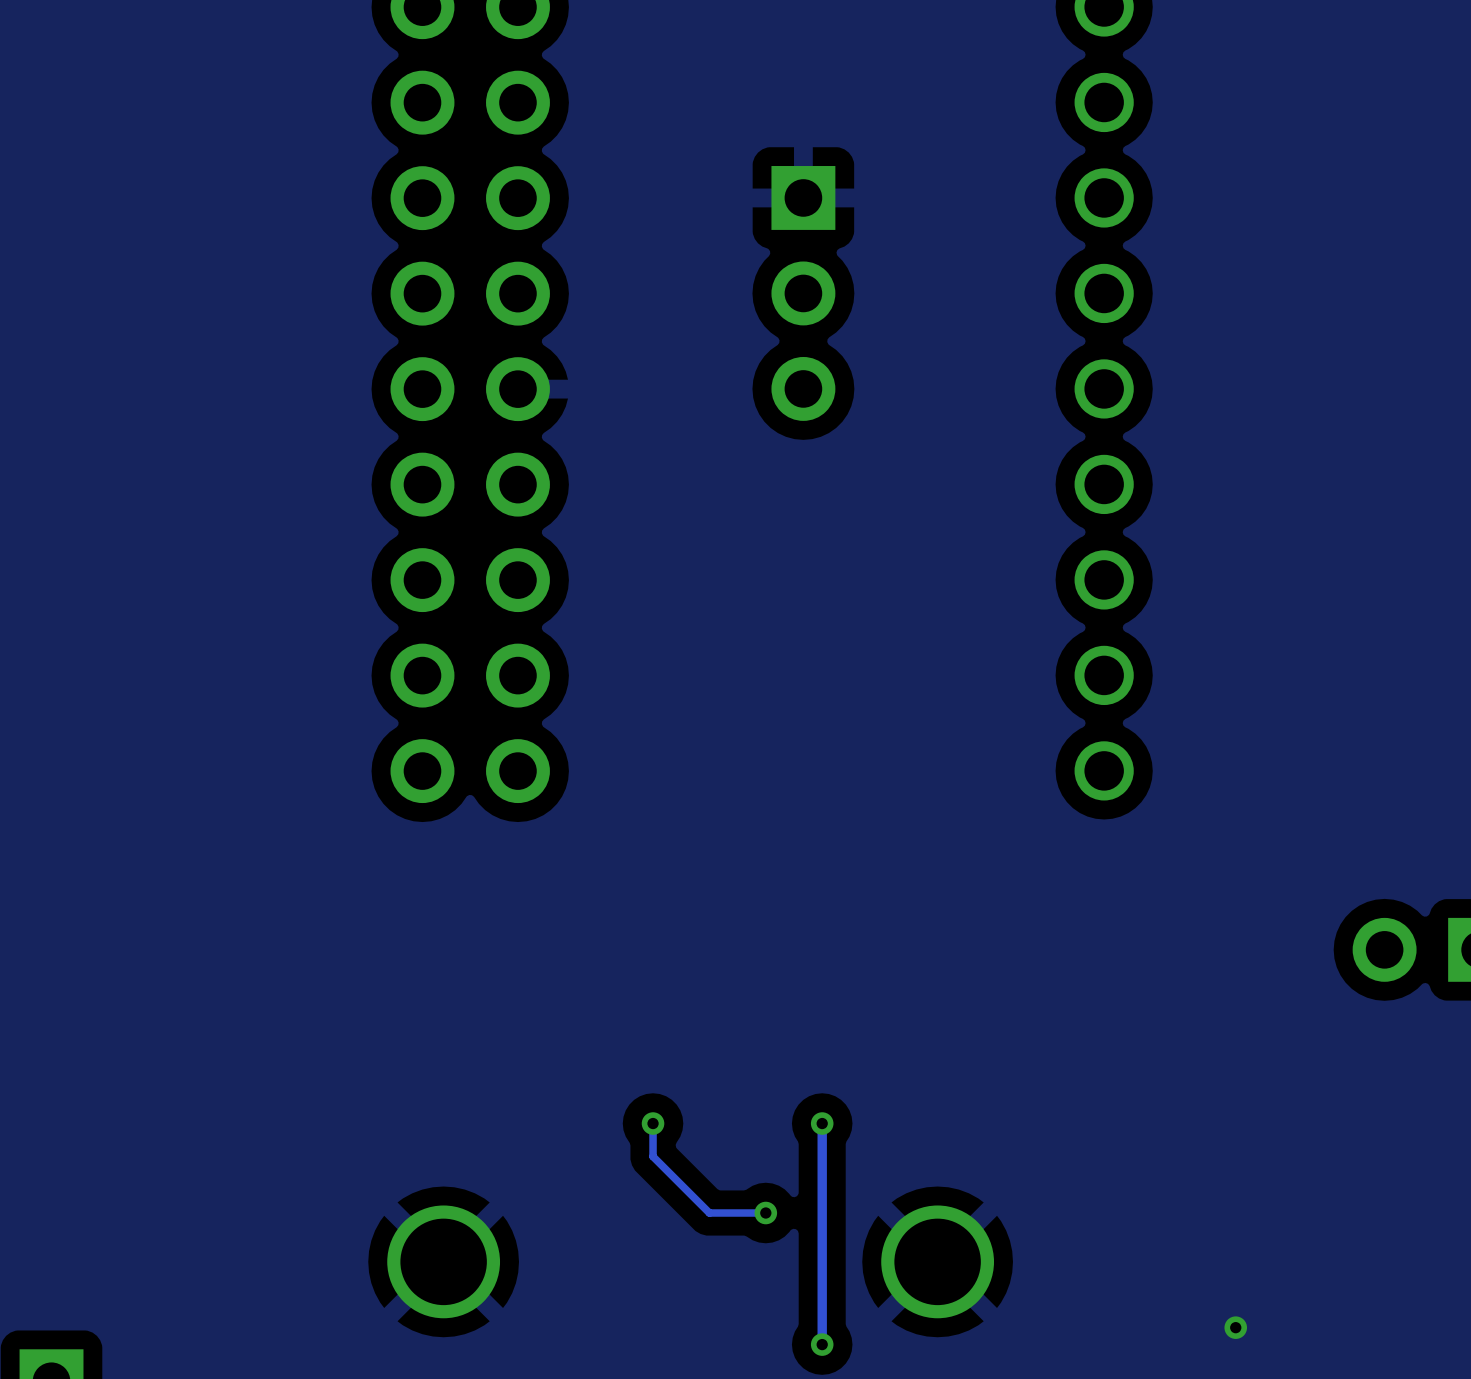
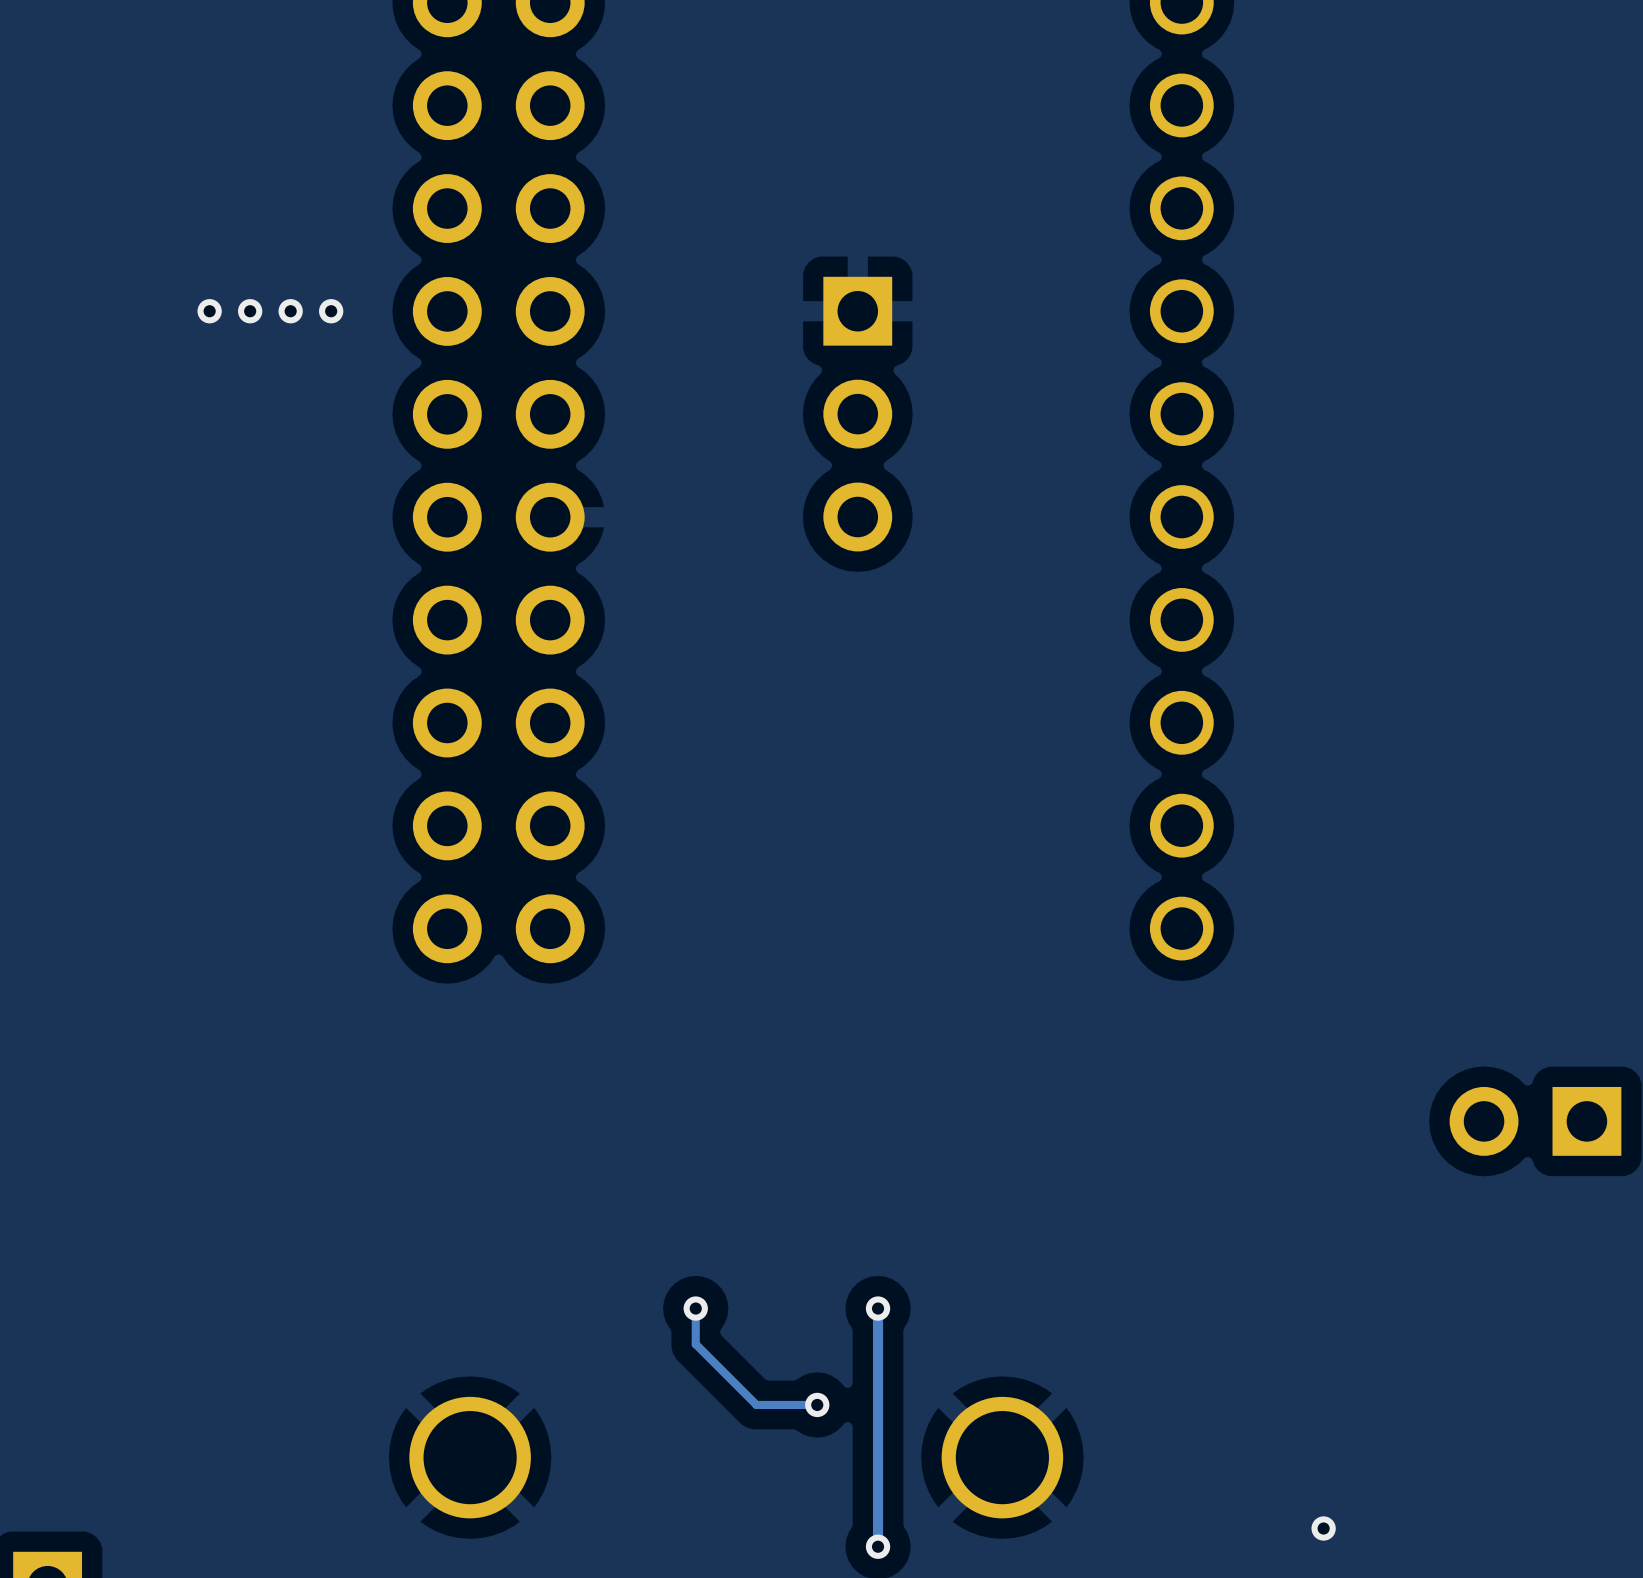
via: none -> (209, 311)
via: none -> (250, 311)
via: none -> (290, 311)
via: none -> (331, 311)

